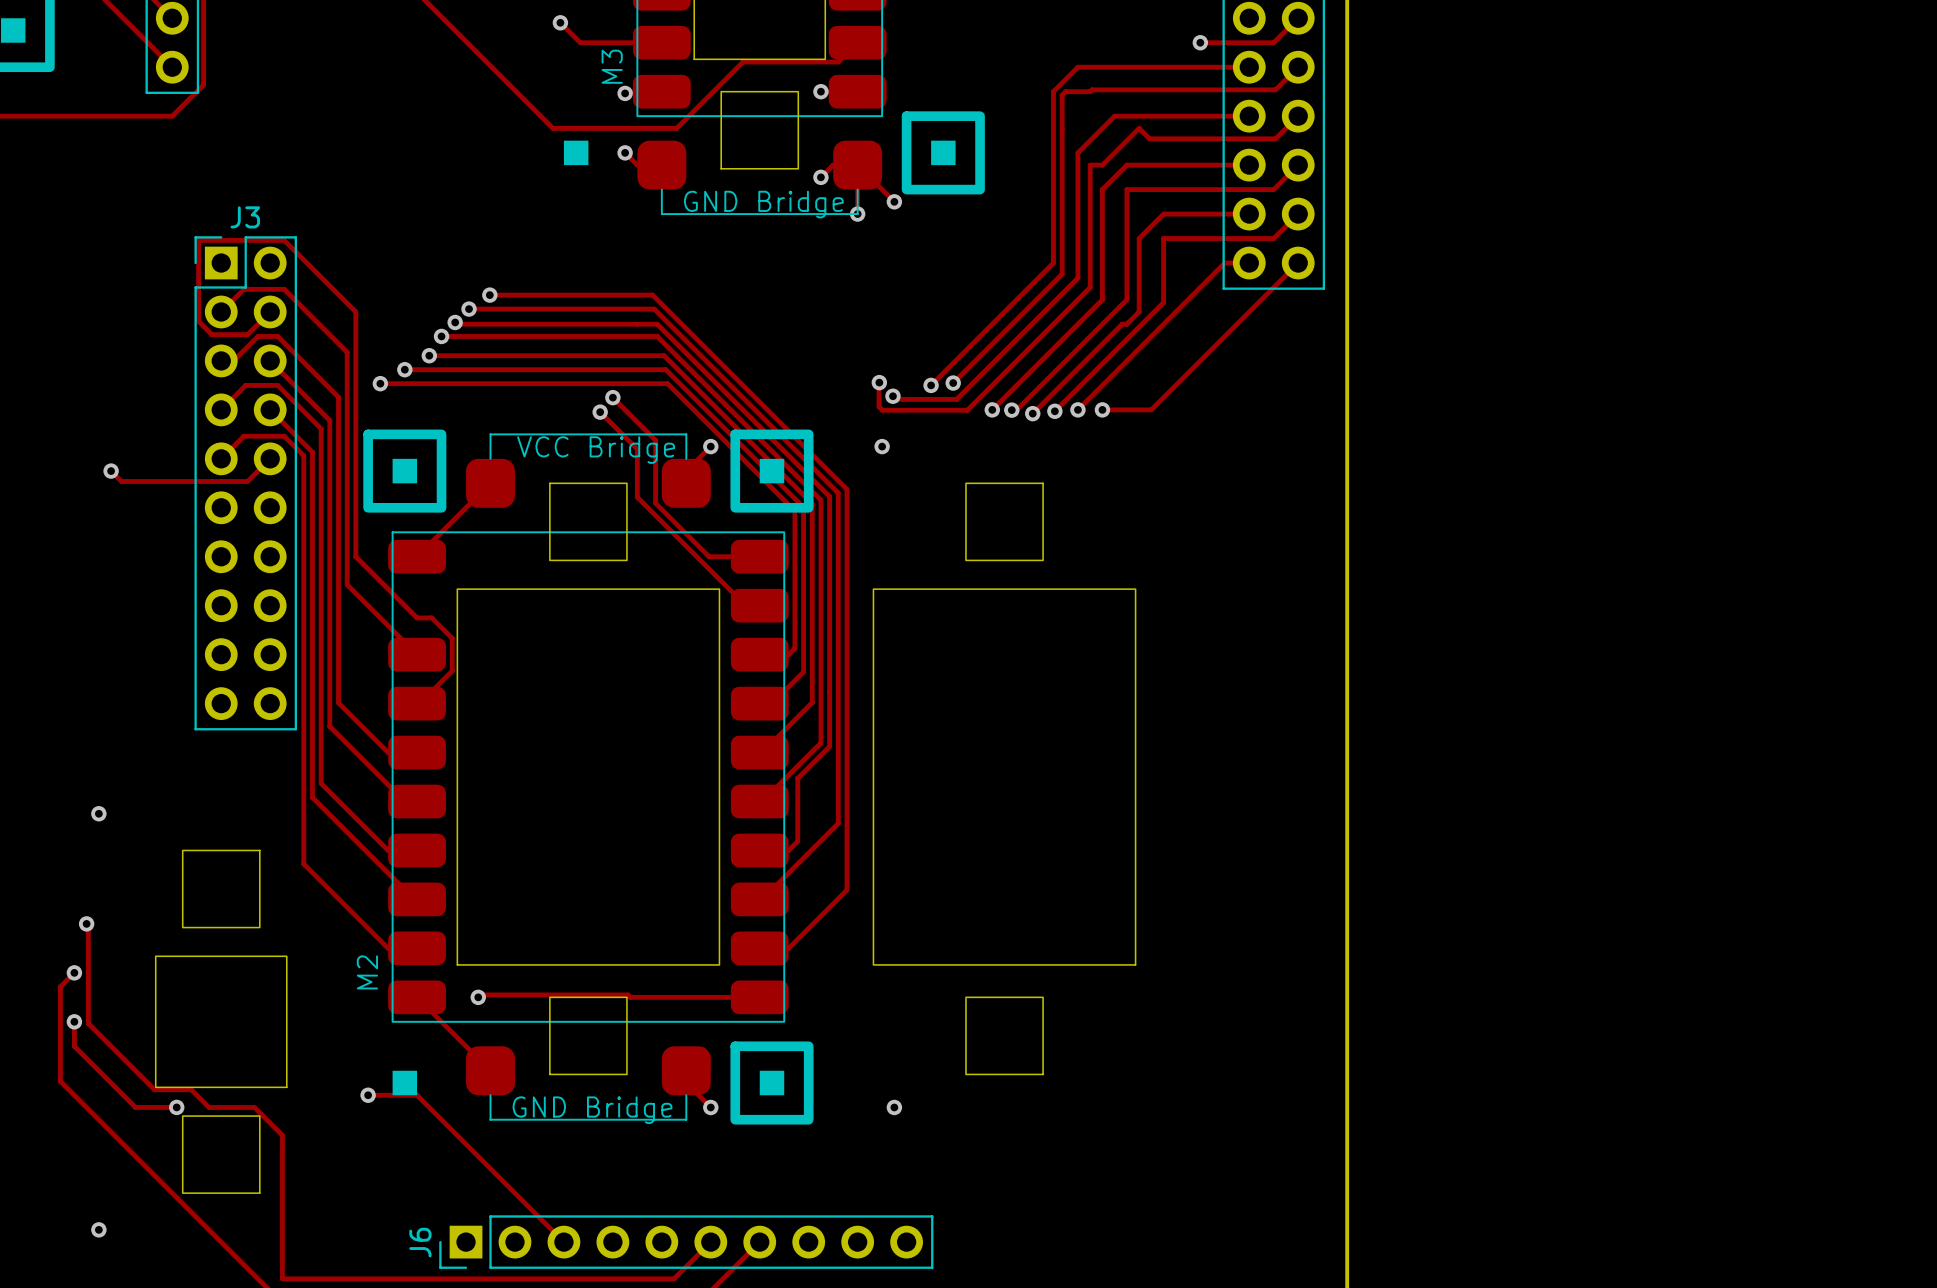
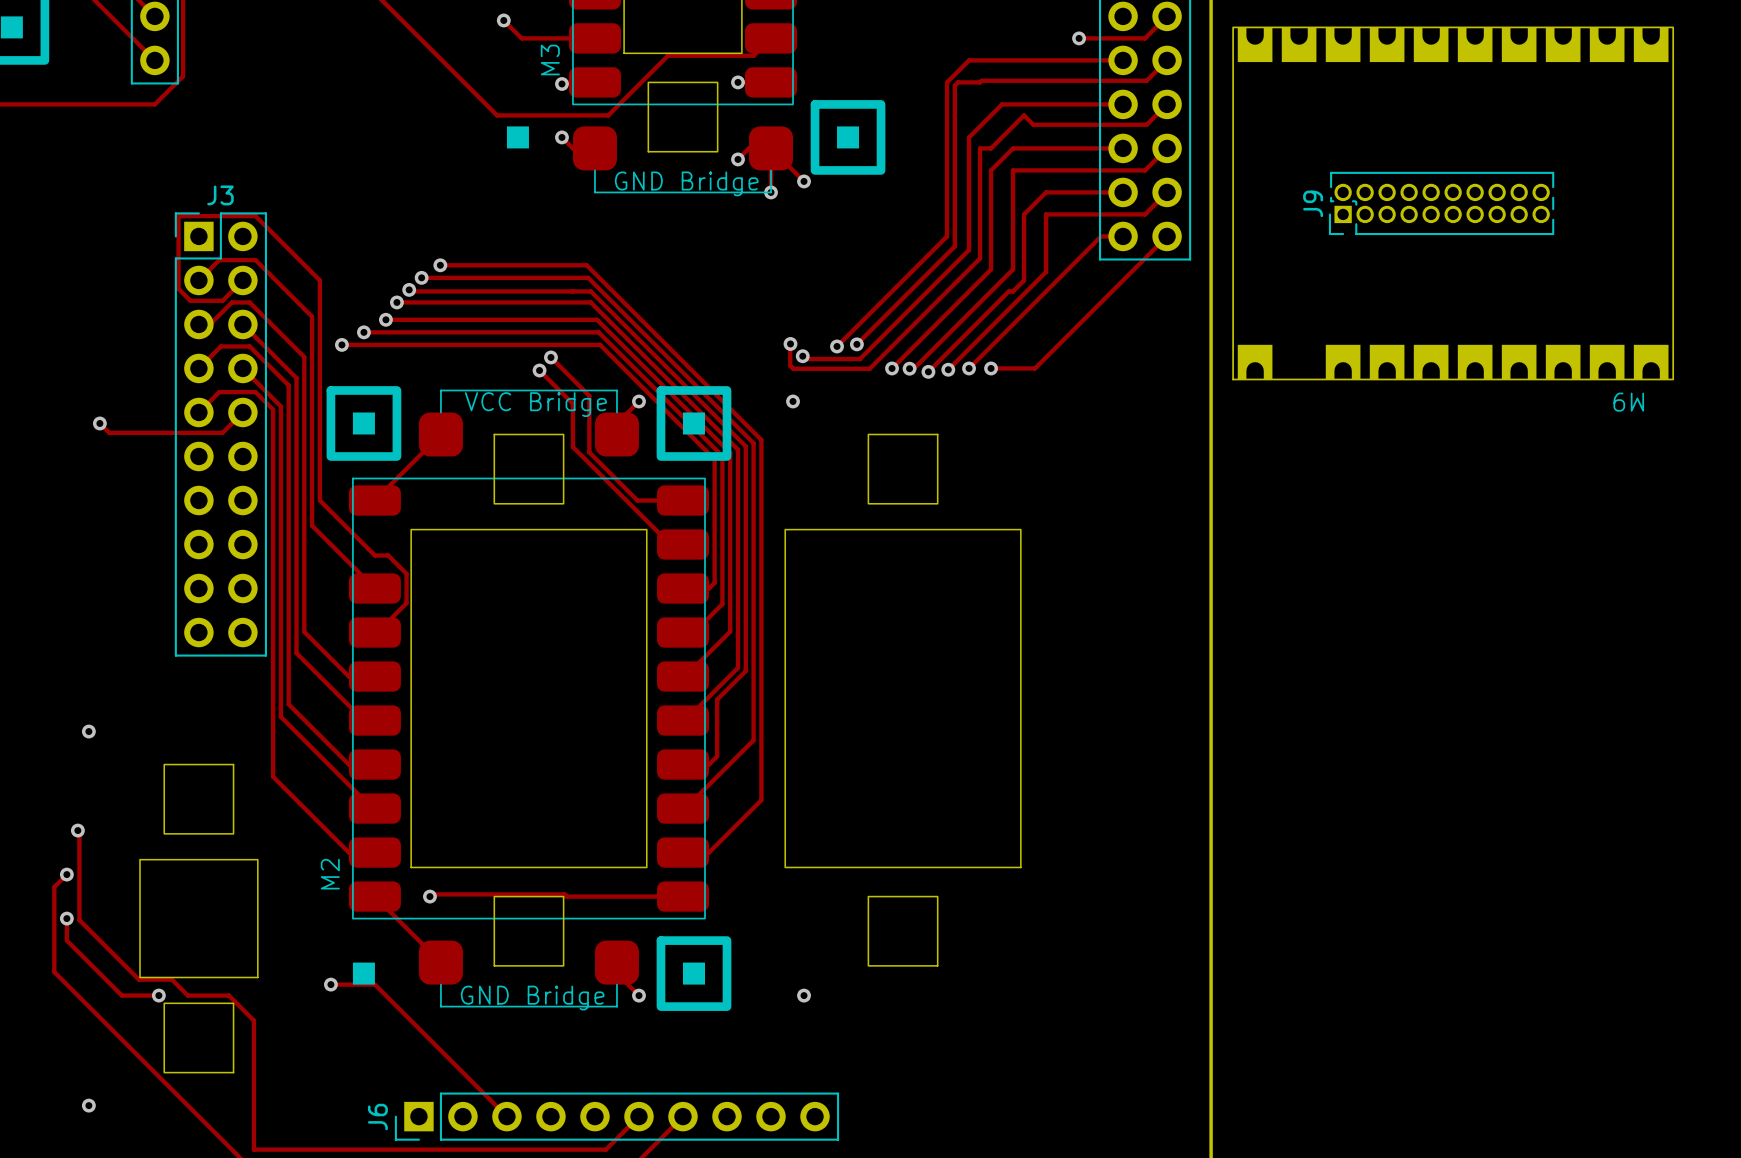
J9: none -> (1441, 203)
M9: none -> (1453, 203)

